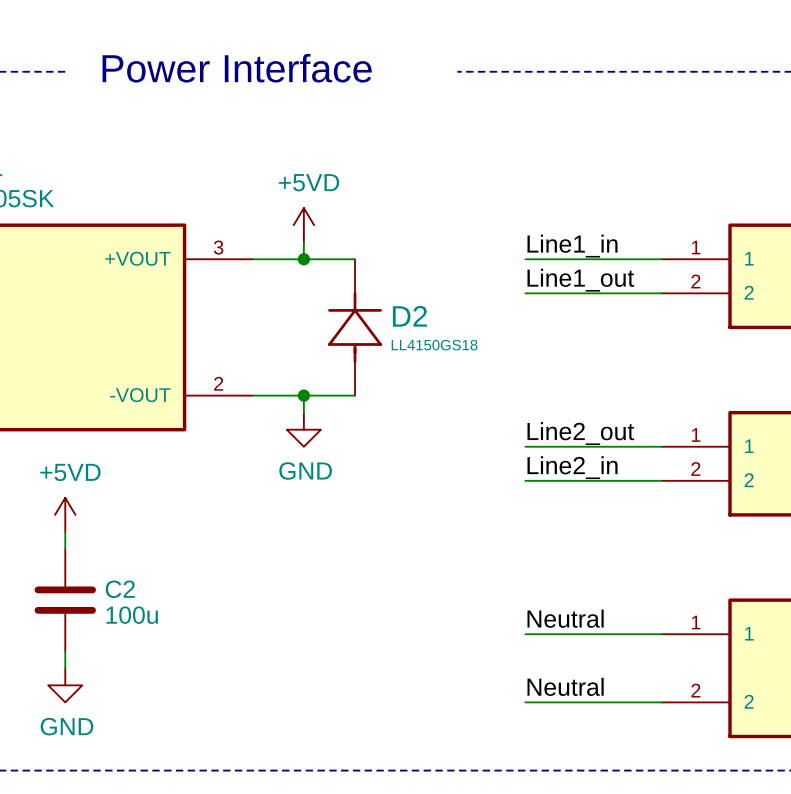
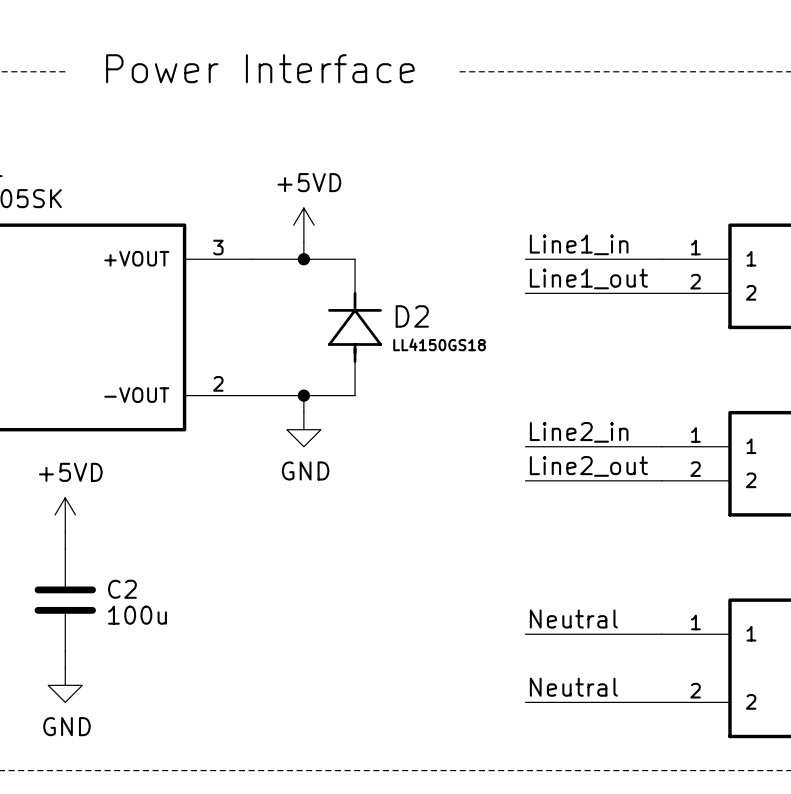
label: Line2_out (580, 433) -> Line2_in (579, 432)
label: Line2_in (572, 467) -> Line2_out (588, 466)

